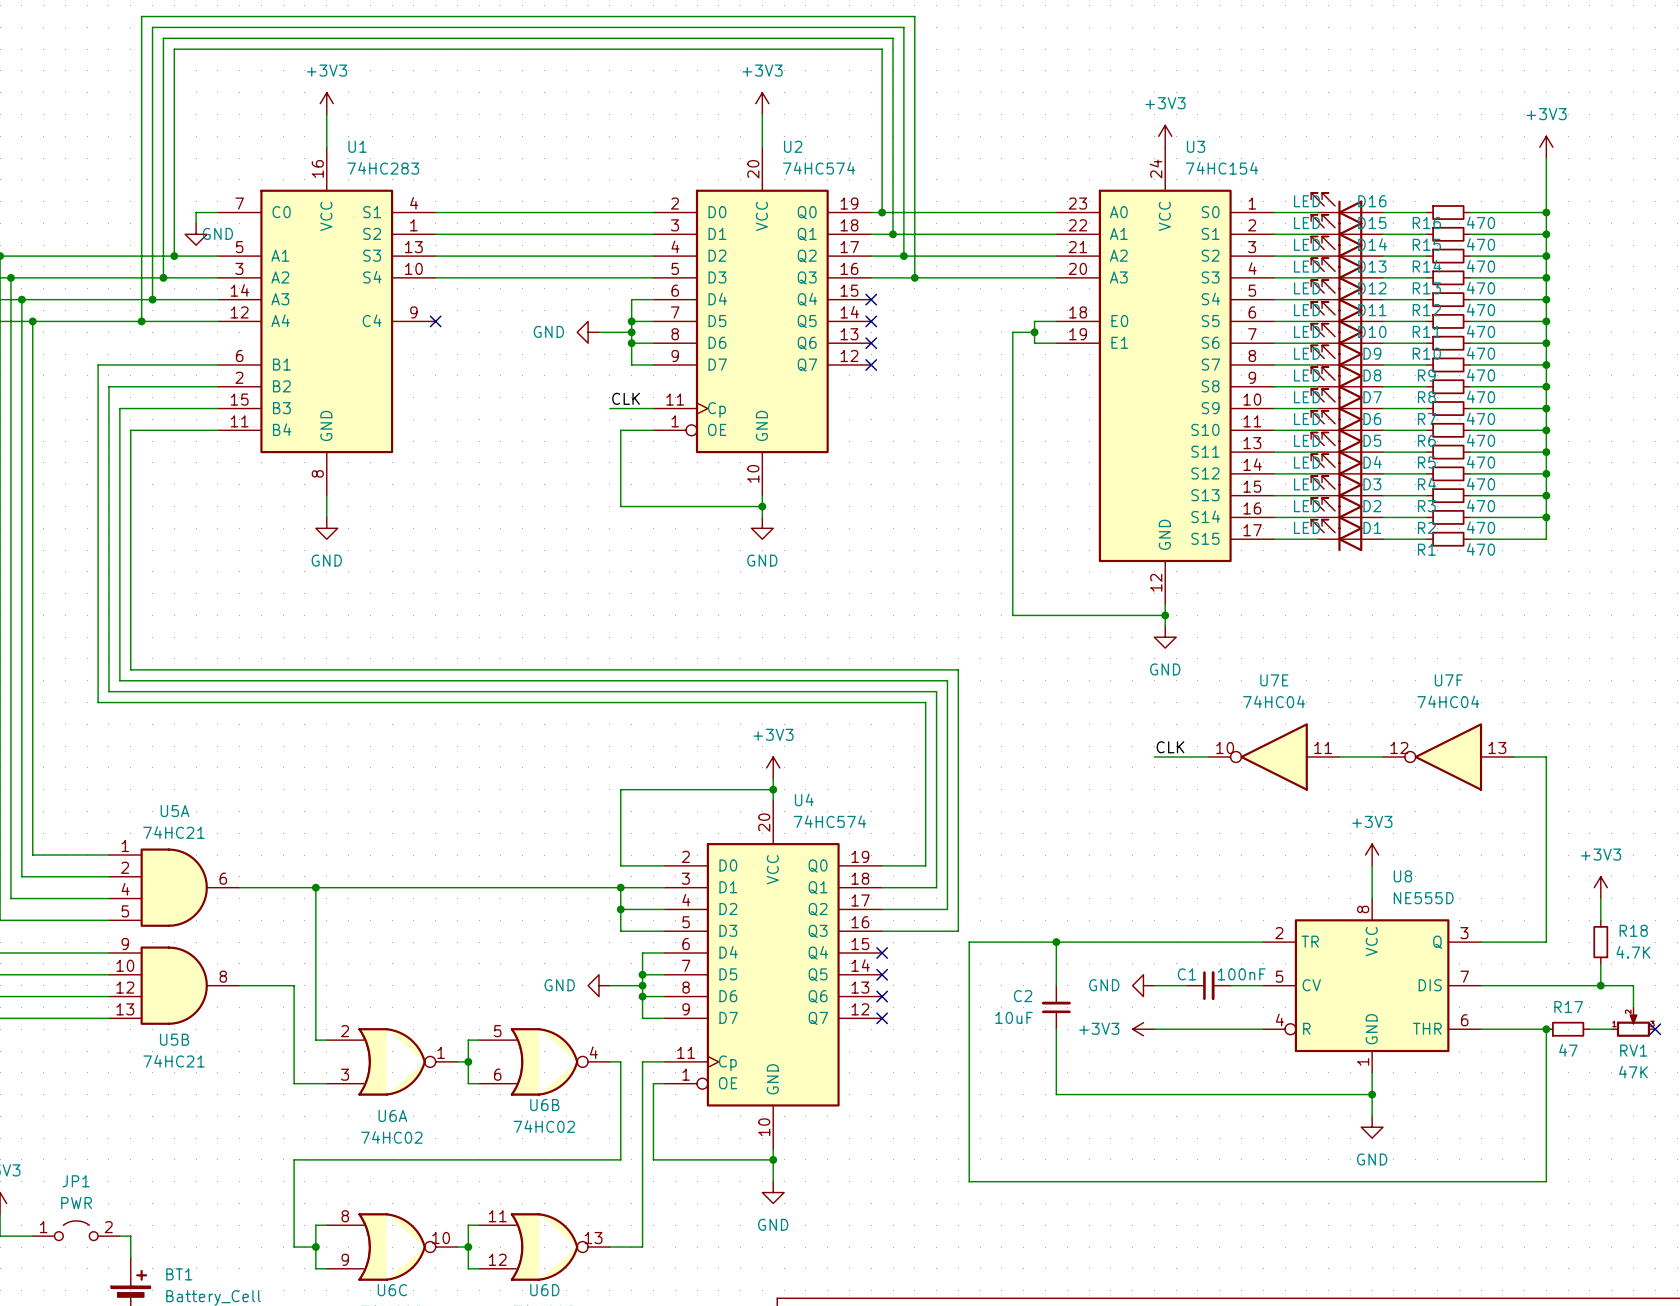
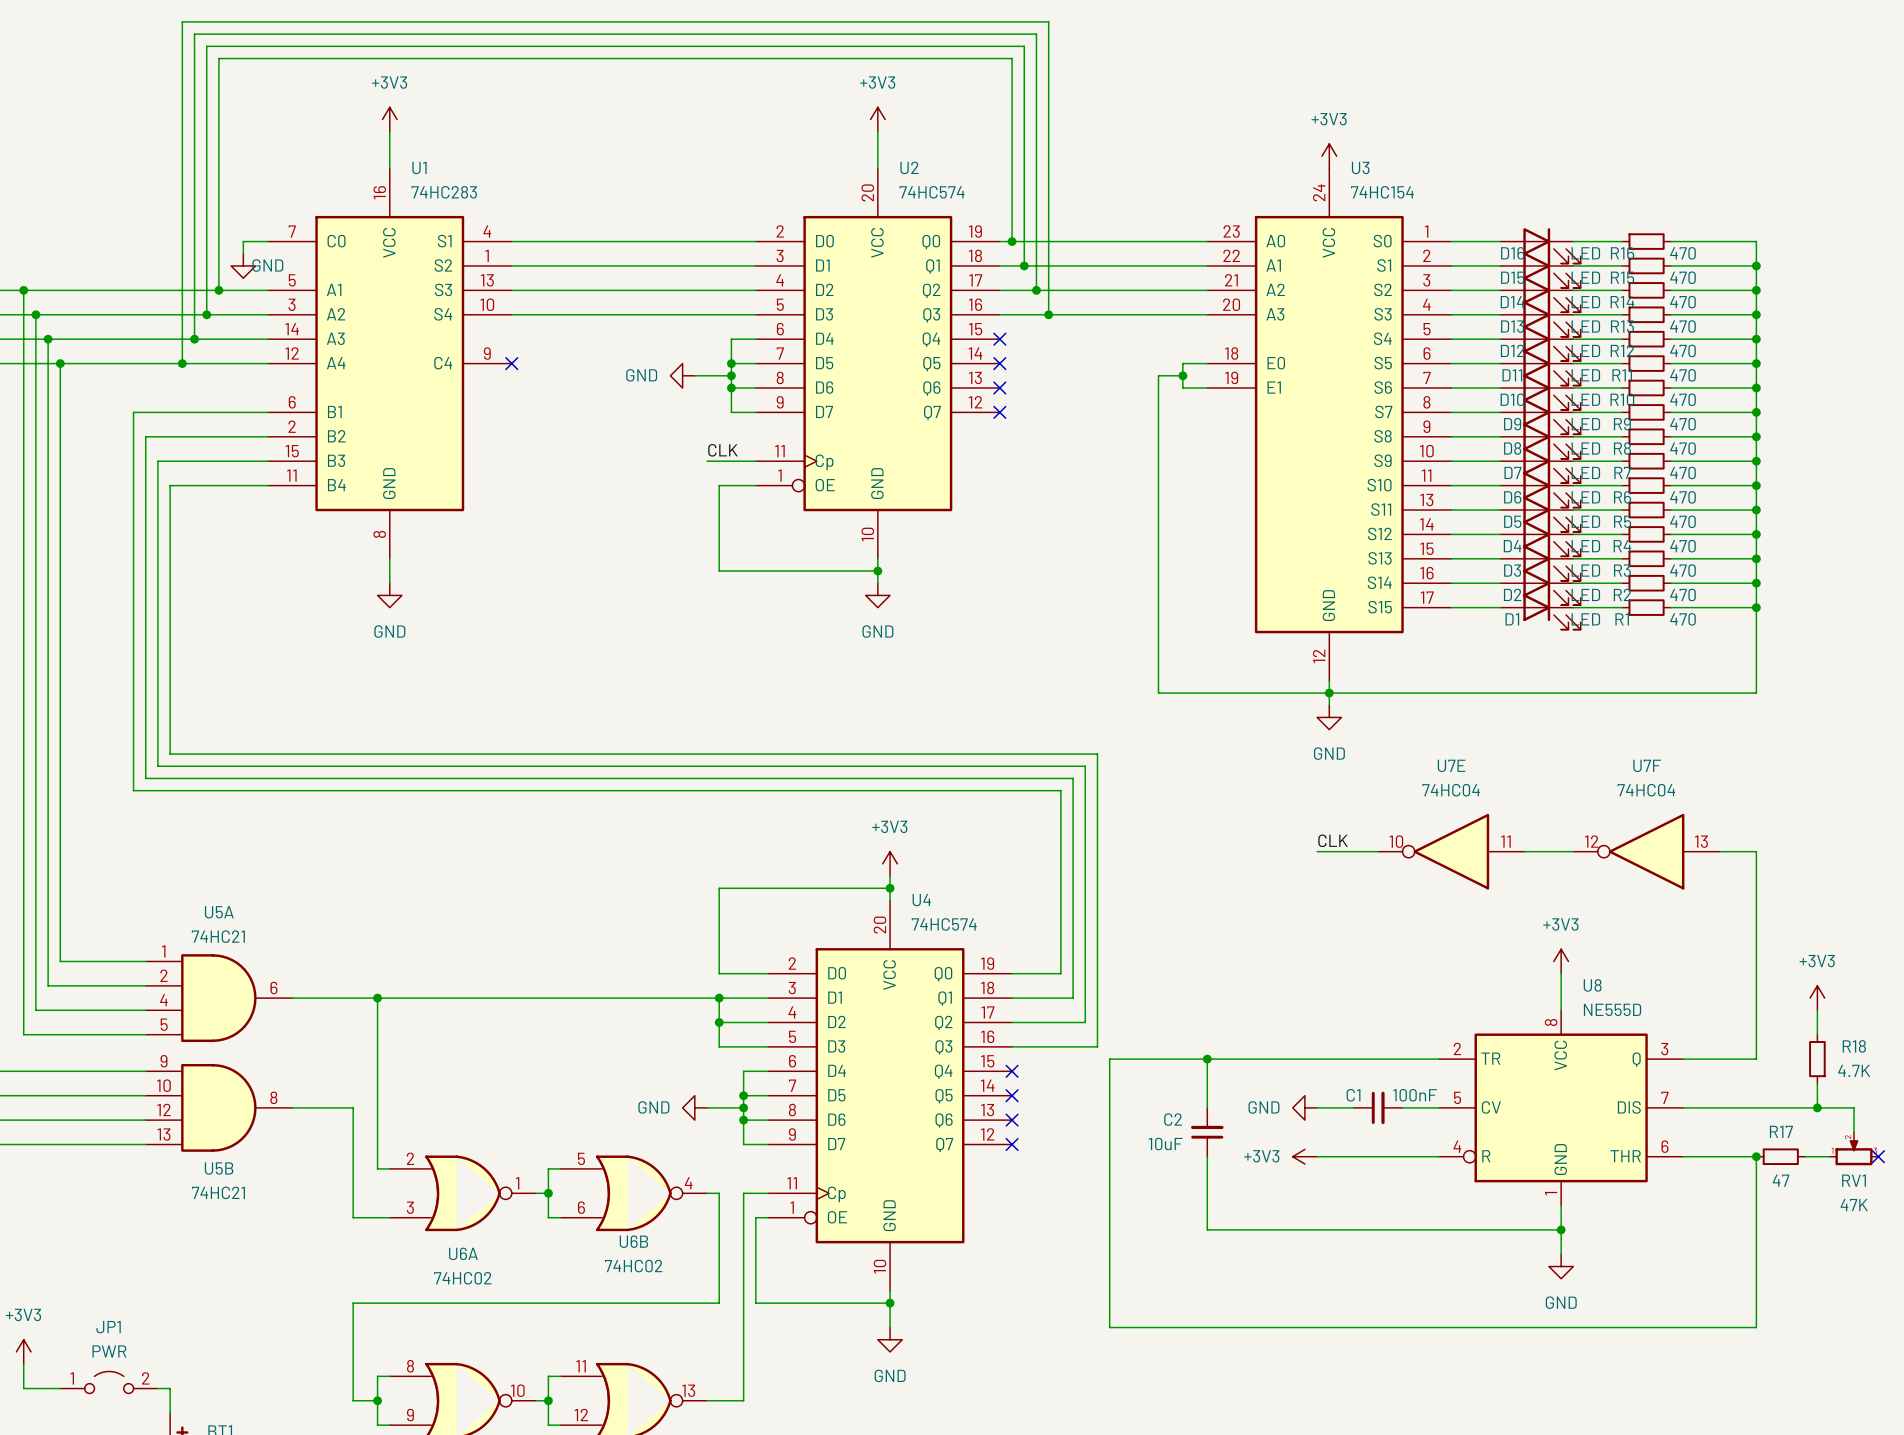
power symbol: +3V3 (1546, 147) -> none
wire: (1546, 158) (1546, 212) -> none
D16 rotation: 0° (1336, 208) -> 180° (1552, 245)
junction: (1546, 212) -> none
D15 rotation: 0° (1336, 230) -> 180° (1552, 270)
D14 rotation: 0° (1336, 252) -> 180° (1552, 294)
D13 rotation: 0° (1336, 274) -> 180° (1552, 319)
D12 rotation: 0° (1336, 295) -> 180° (1552, 343)
D11 rotation: 0° (1336, 317) -> 180° (1552, 367)
D10 rotation: 0° (1336, 339) -> 180° (1552, 392)
D9 rotation: 0° (1336, 361) -> 180° (1552, 416)
D8 rotation: 0° (1336, 382) -> 180° (1552, 441)
D7 rotation: 0° (1336, 404) -> 180° (1552, 465)
D6 rotation: 0° (1336, 426) -> 180° (1552, 489)
D5 rotation: 0° (1336, 448) -> 180° (1552, 514)
D4 rotation: 0° (1336, 470) -> 180° (1552, 538)
D3 rotation: 0° (1336, 491) -> 180° (1552, 563)
D2 rotation: 0° (1336, 513) -> 180° (1552, 587)
D1 rotation: 0° (1336, 535) -> 180° (1552, 611)
wire: none -> (1756, 607) (1756, 693) (1329, 693)
junction: none -> (1756, 607)

